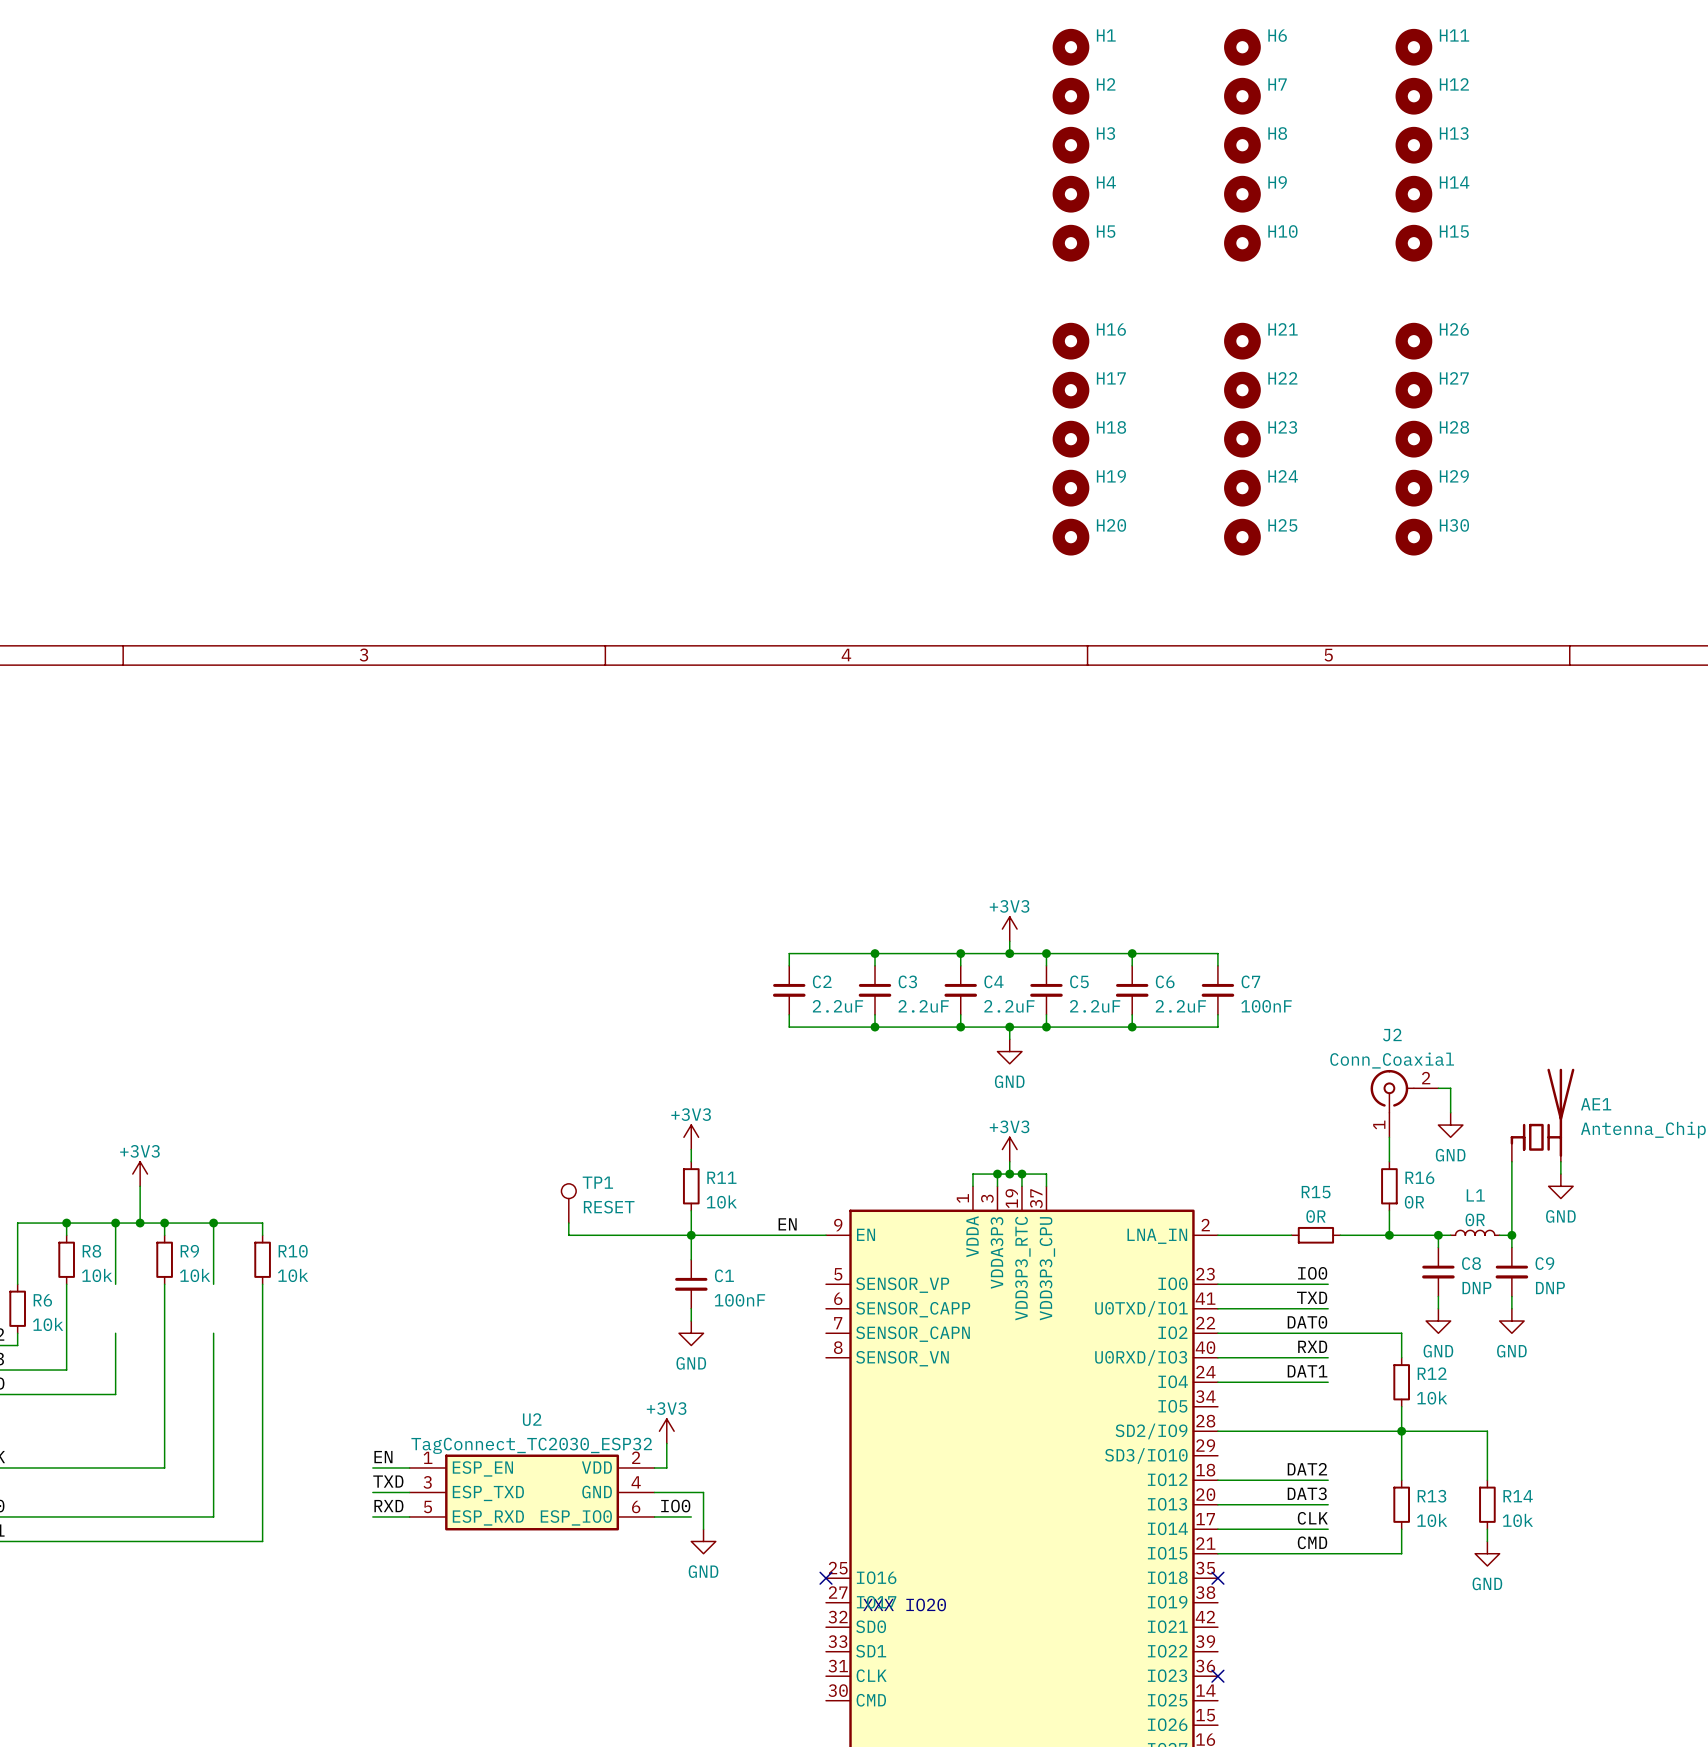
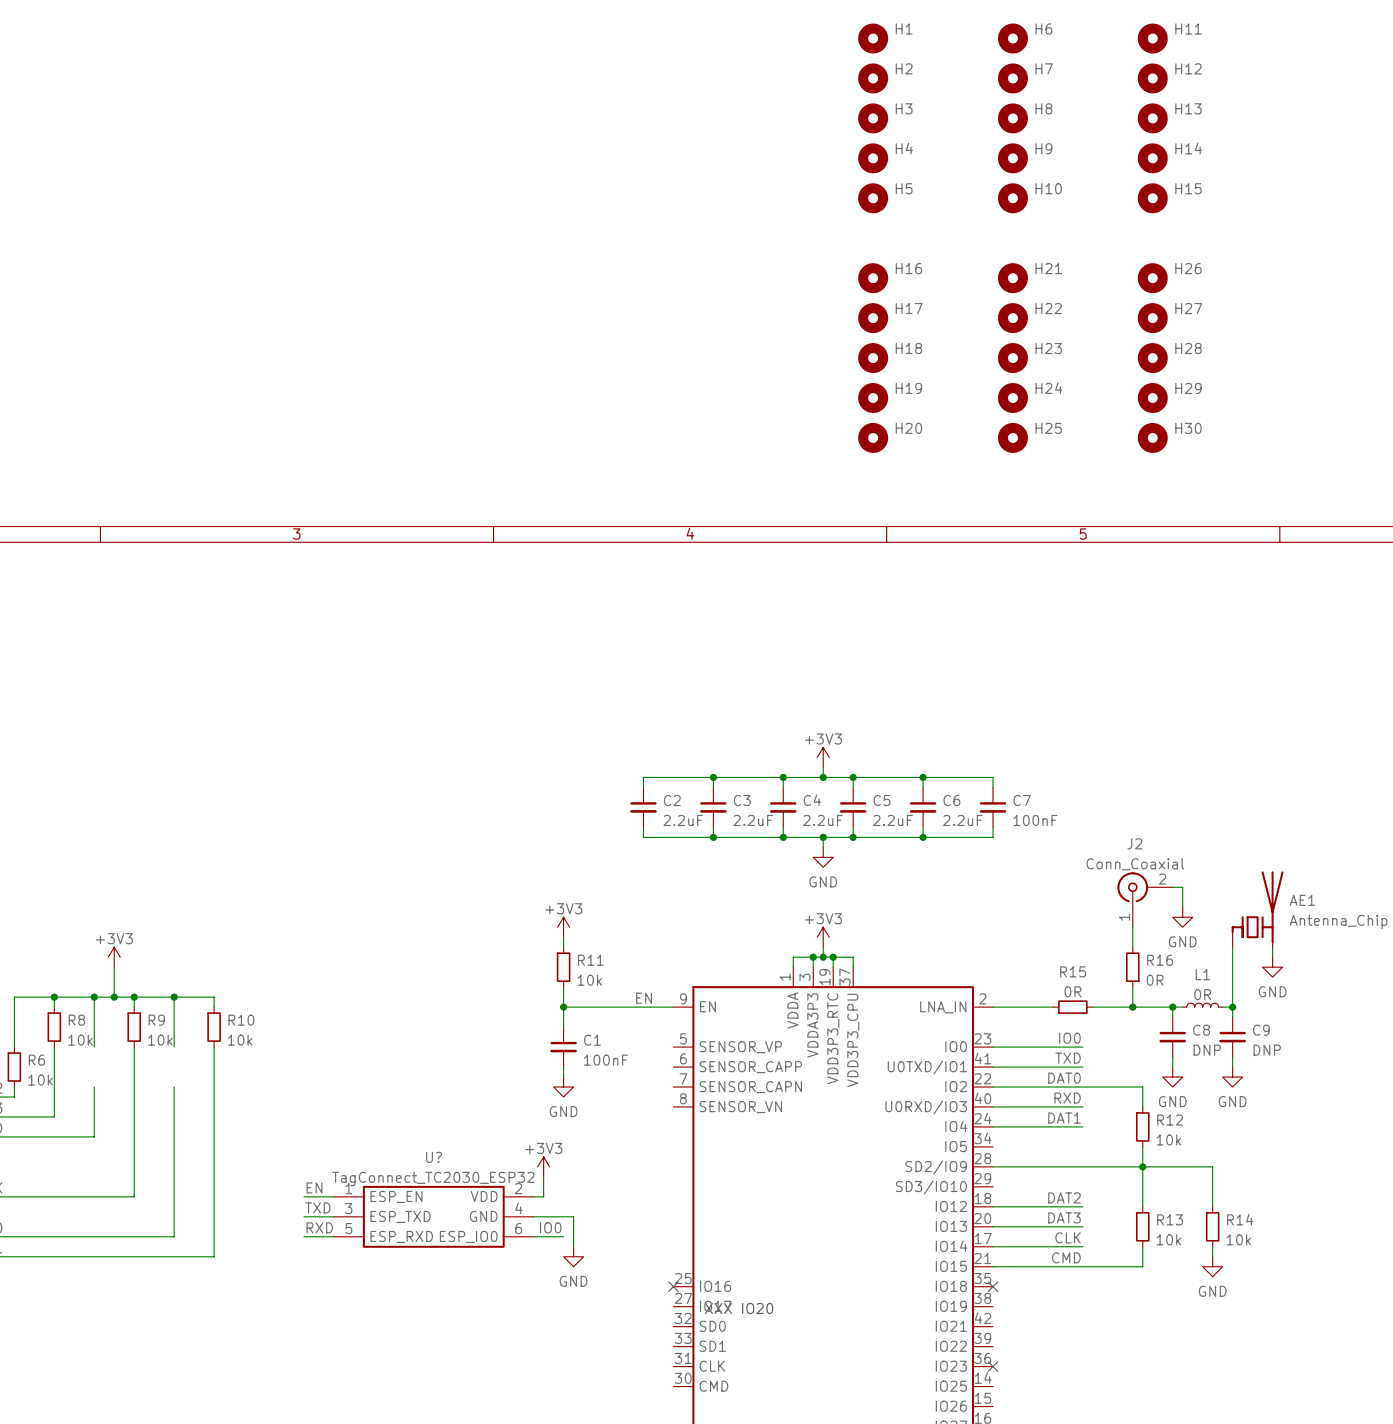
TP1: RESET (568, 1203) -> none
wire: (568, 1223) (568, 1235) (691, 1235) -> none
U2 name: U2 (532, 1419) -> U? (434, 1157)

